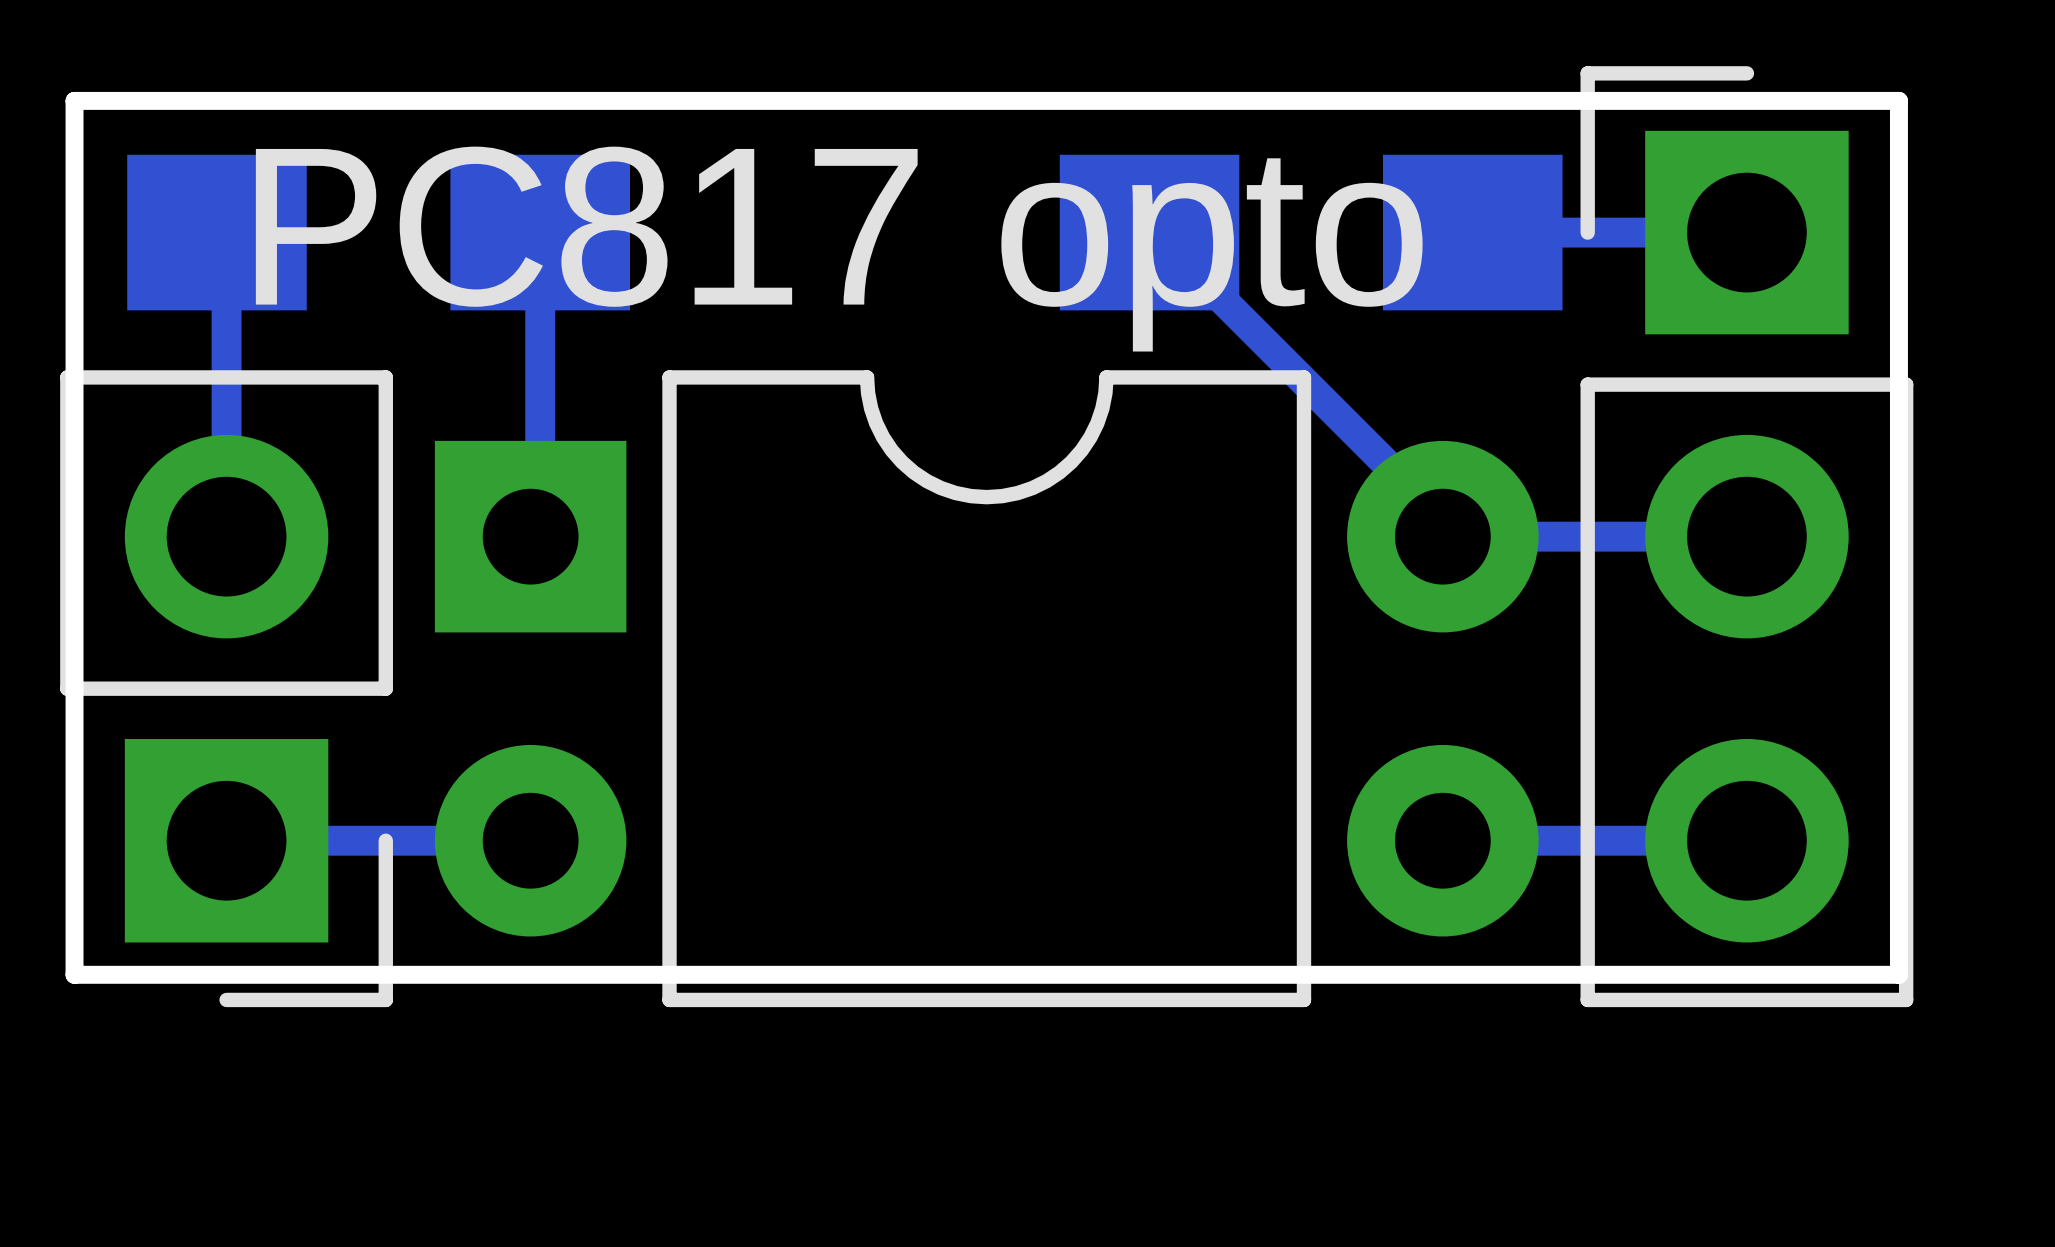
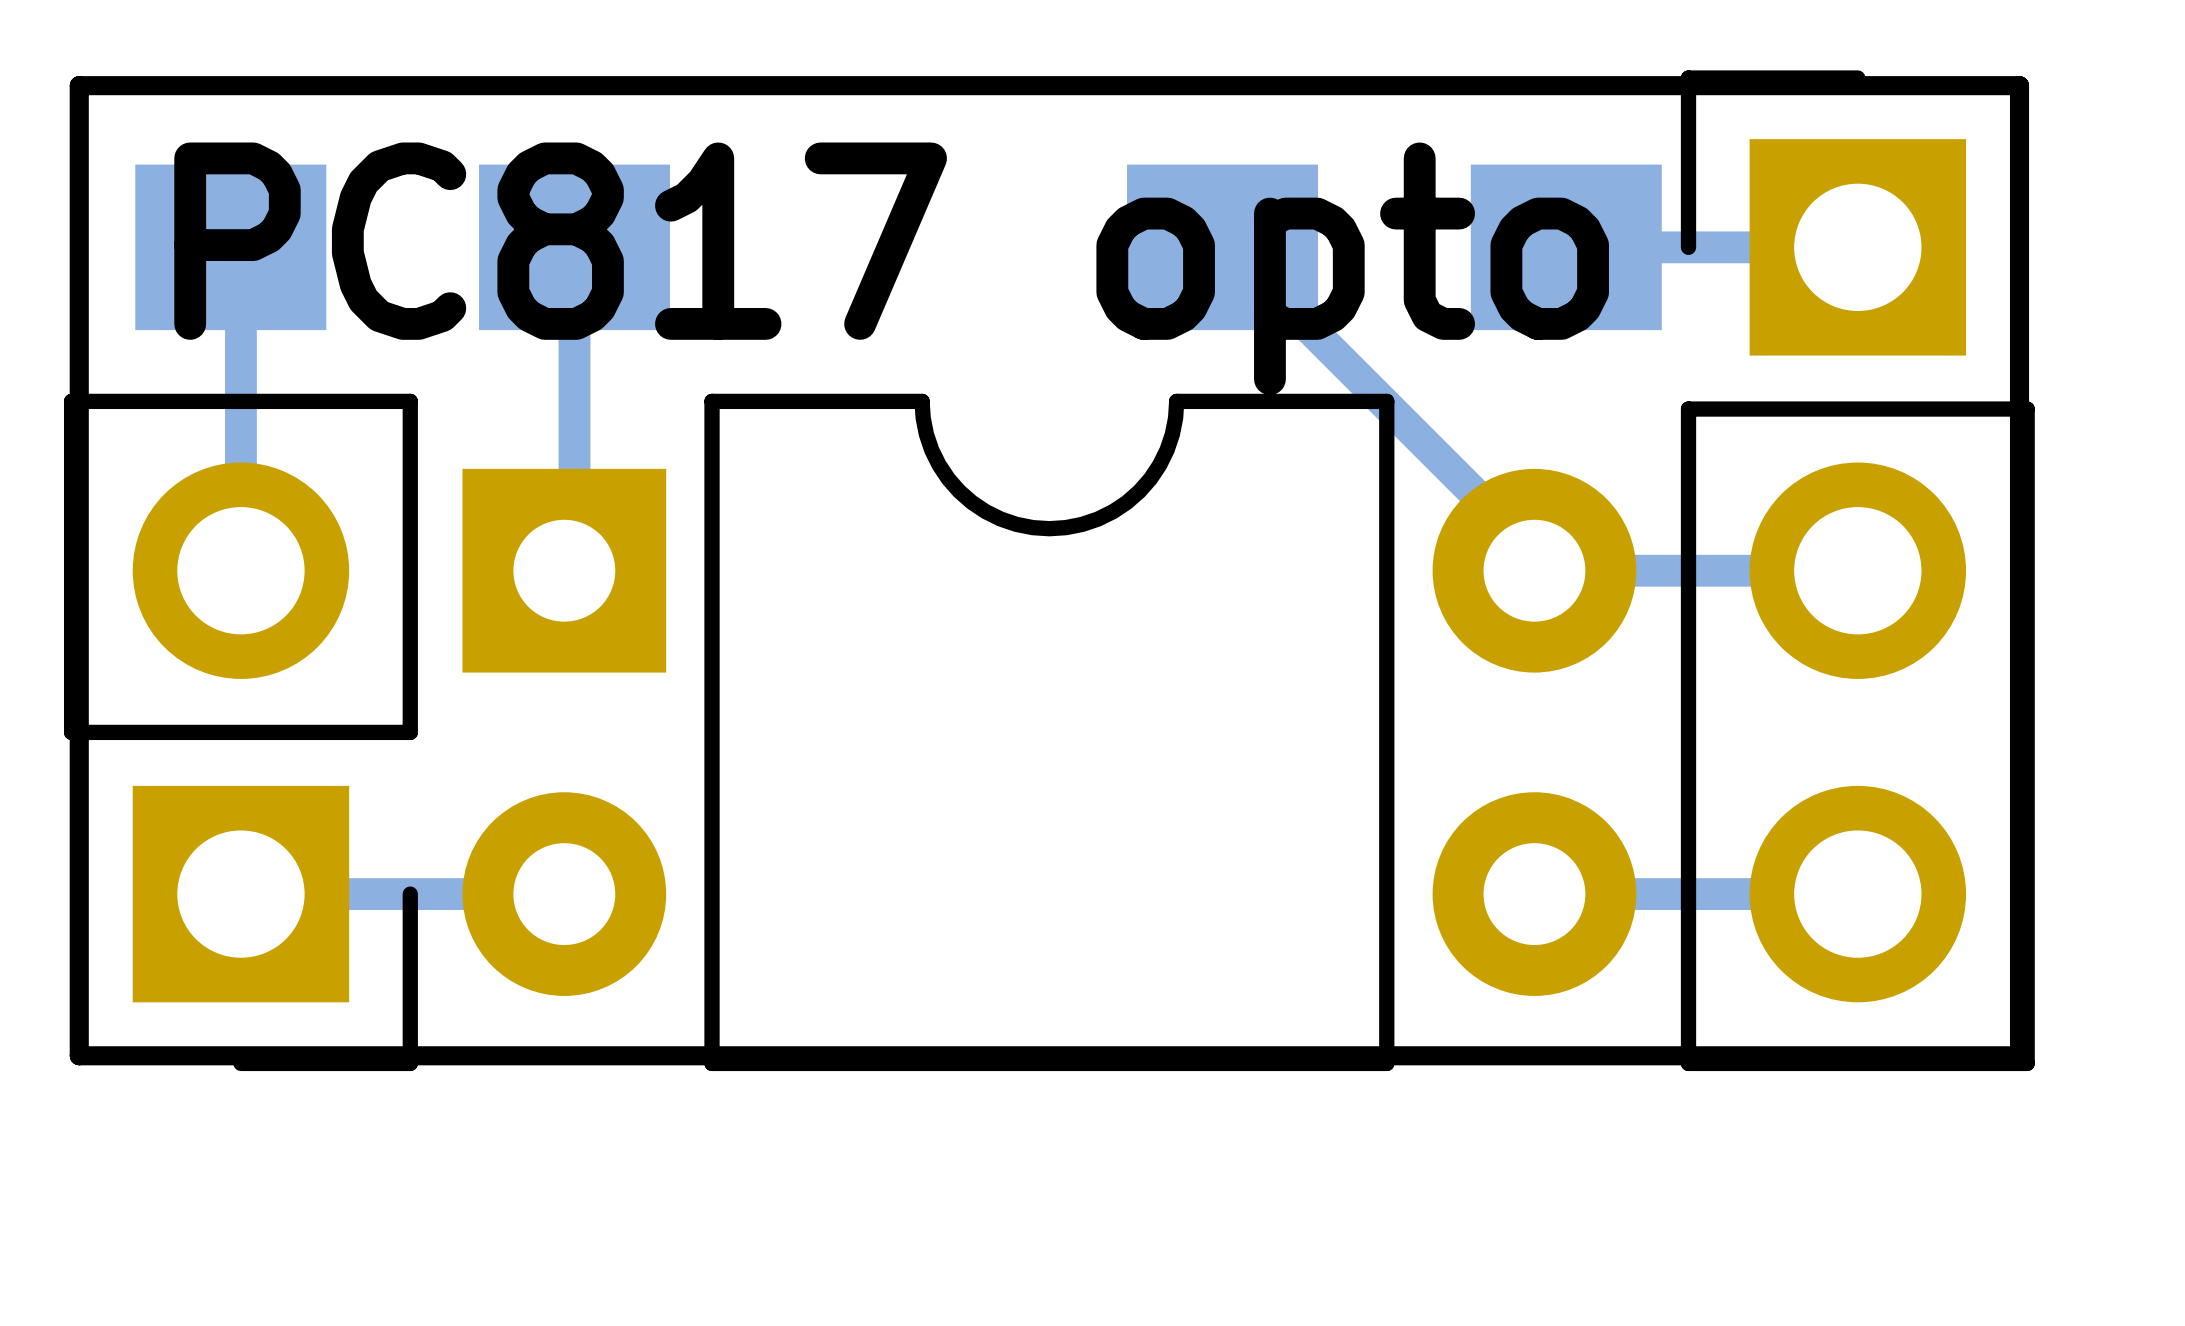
board edge: (74, 100) (1898, 100) -> (79, 107) (79, 85) (2019, 85) (2019, 107)
board edge: (74, 974) (1898, 974) -> (79, 1036) (79, 1055) (2019, 1055) (2019, 1036)

